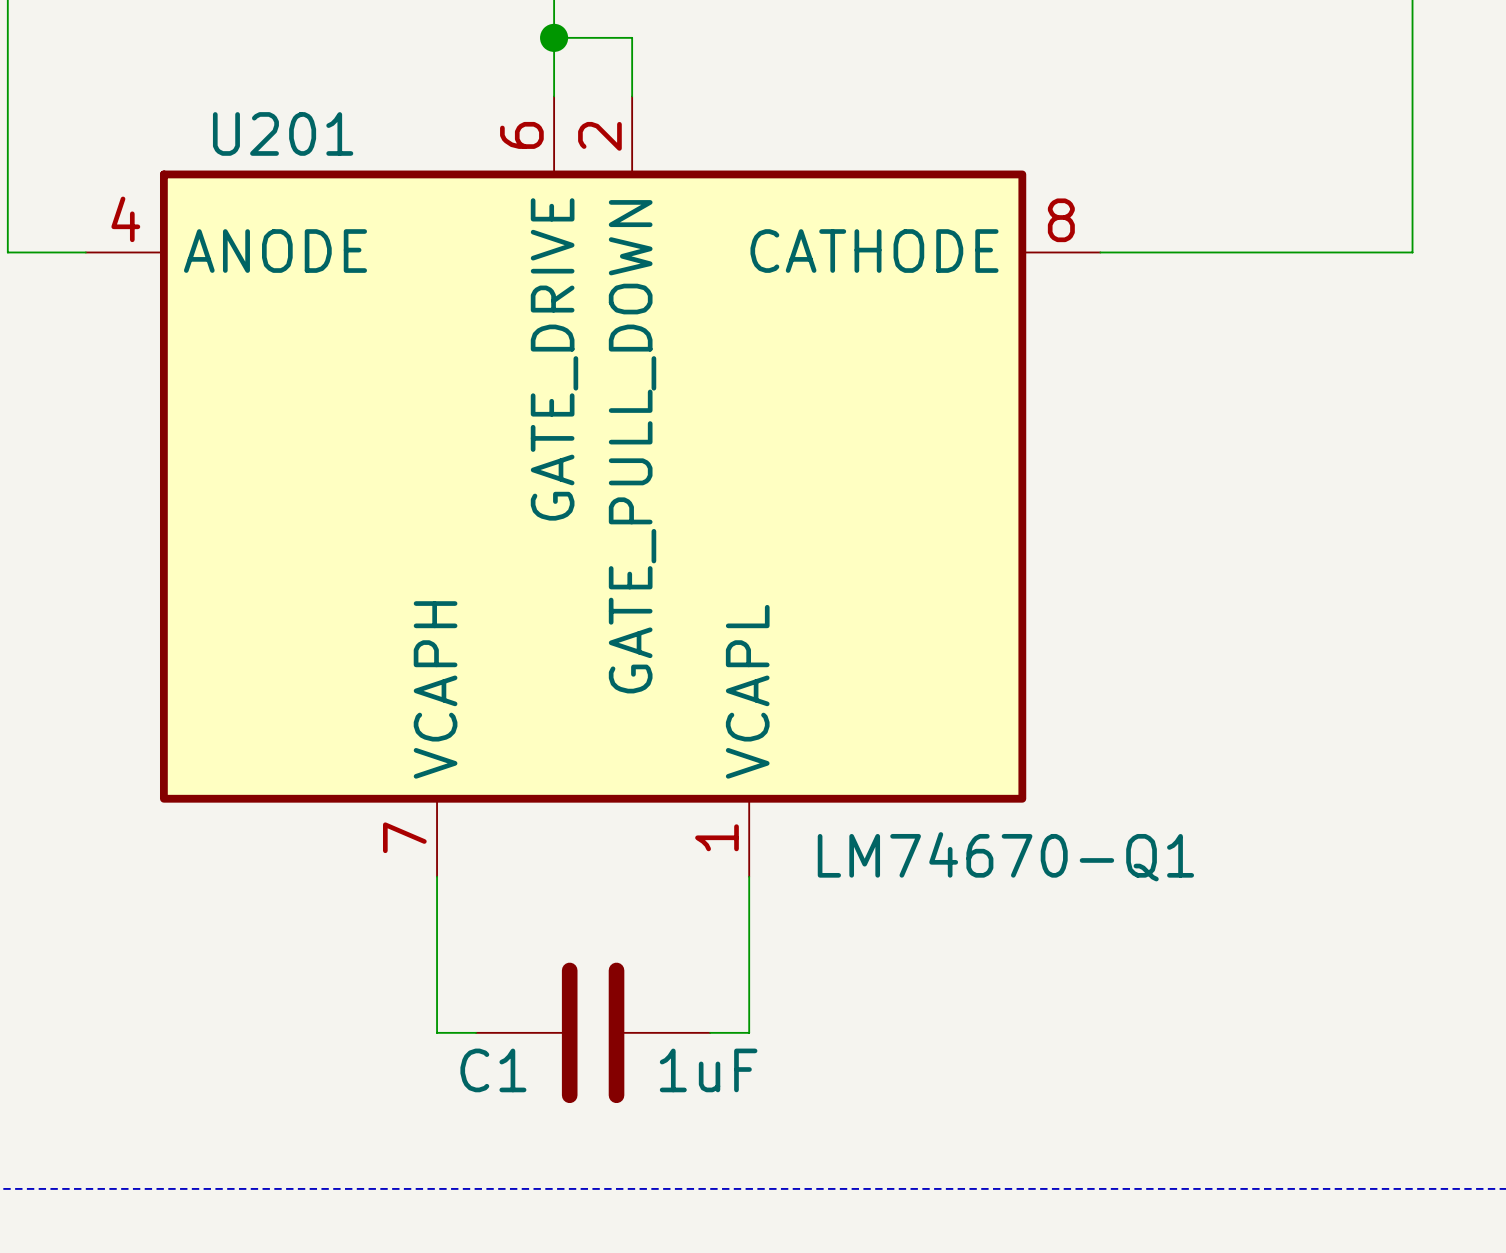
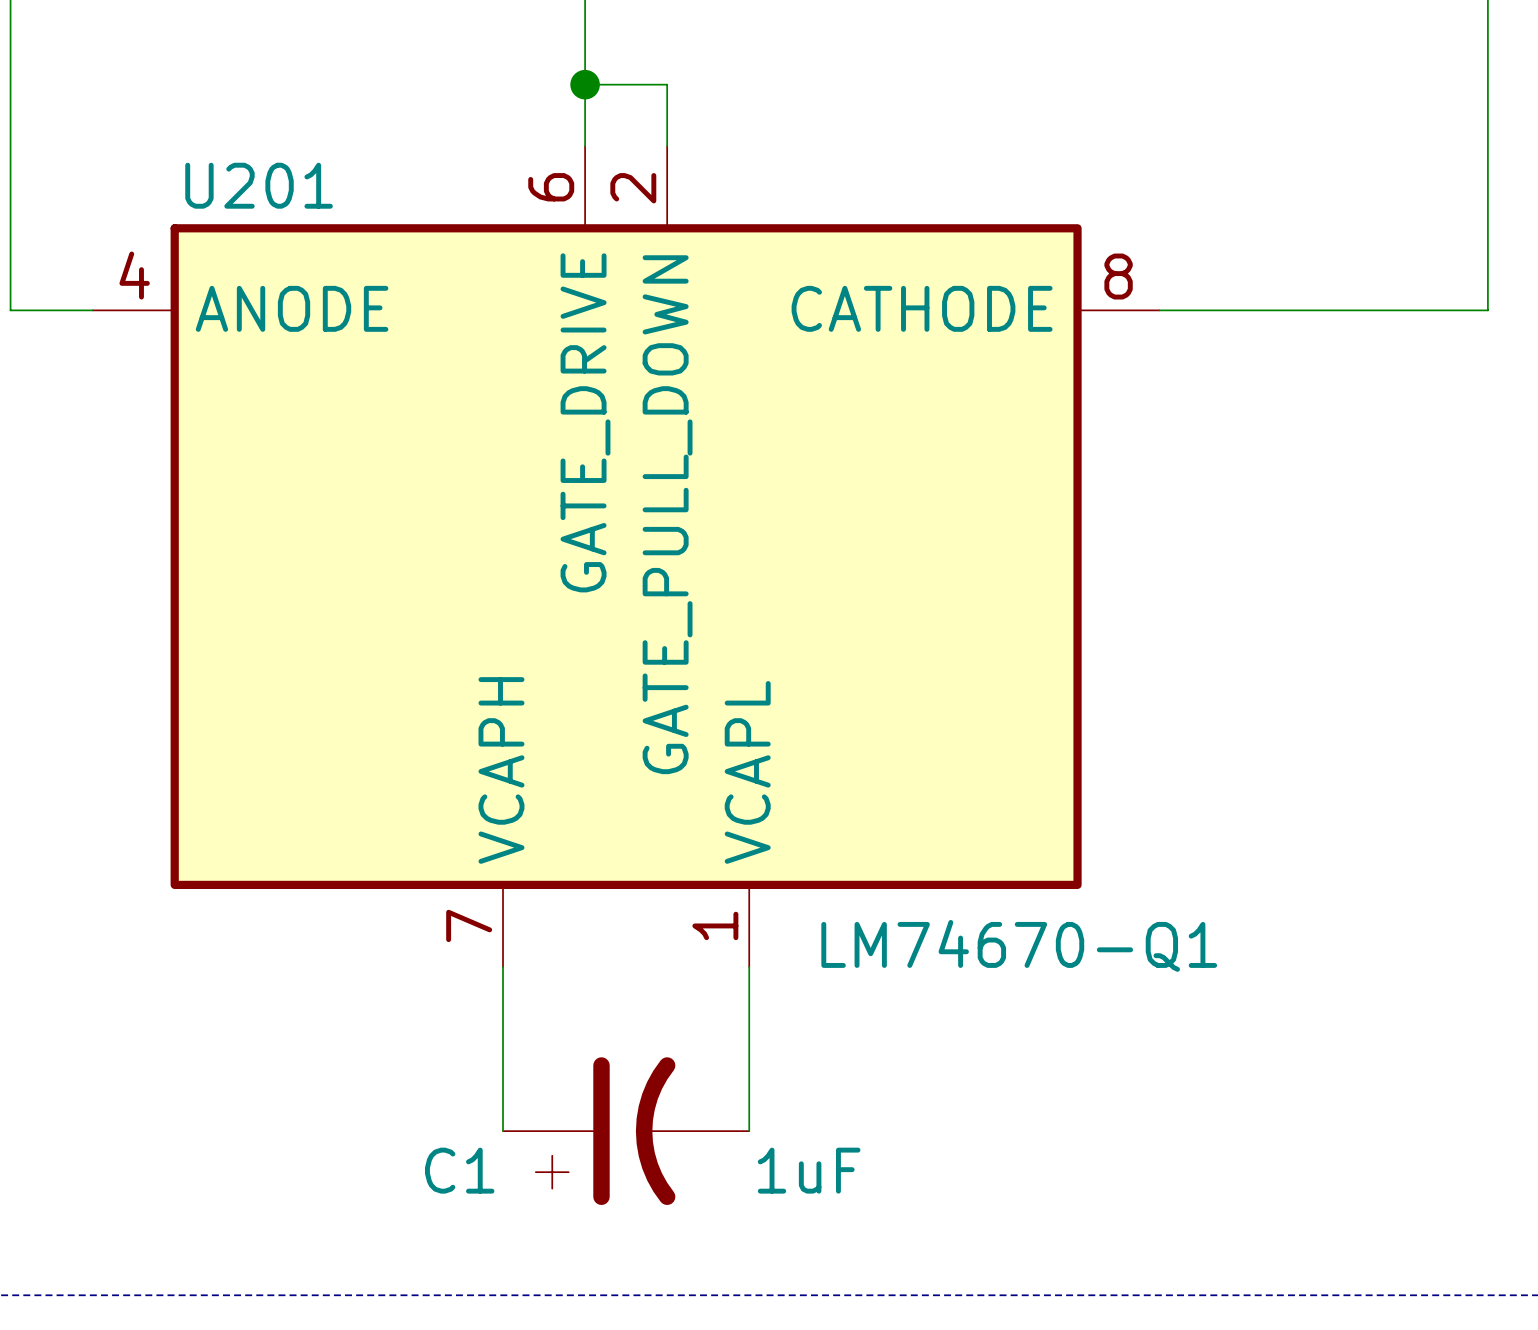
U201 symbol: [85, 96, 1101, 877] -> [92, 146, 1160, 967]
wire: (437, 876) (437, 1032) (476, 1032) -> (503, 966) (503, 1131)
wire: (749, 876) (749, 1032) (710, 1032) -> (749, 966) (749, 1131)
C1 symbol: [476, 962, 711, 1104] -> [503, 1057, 750, 1206]

